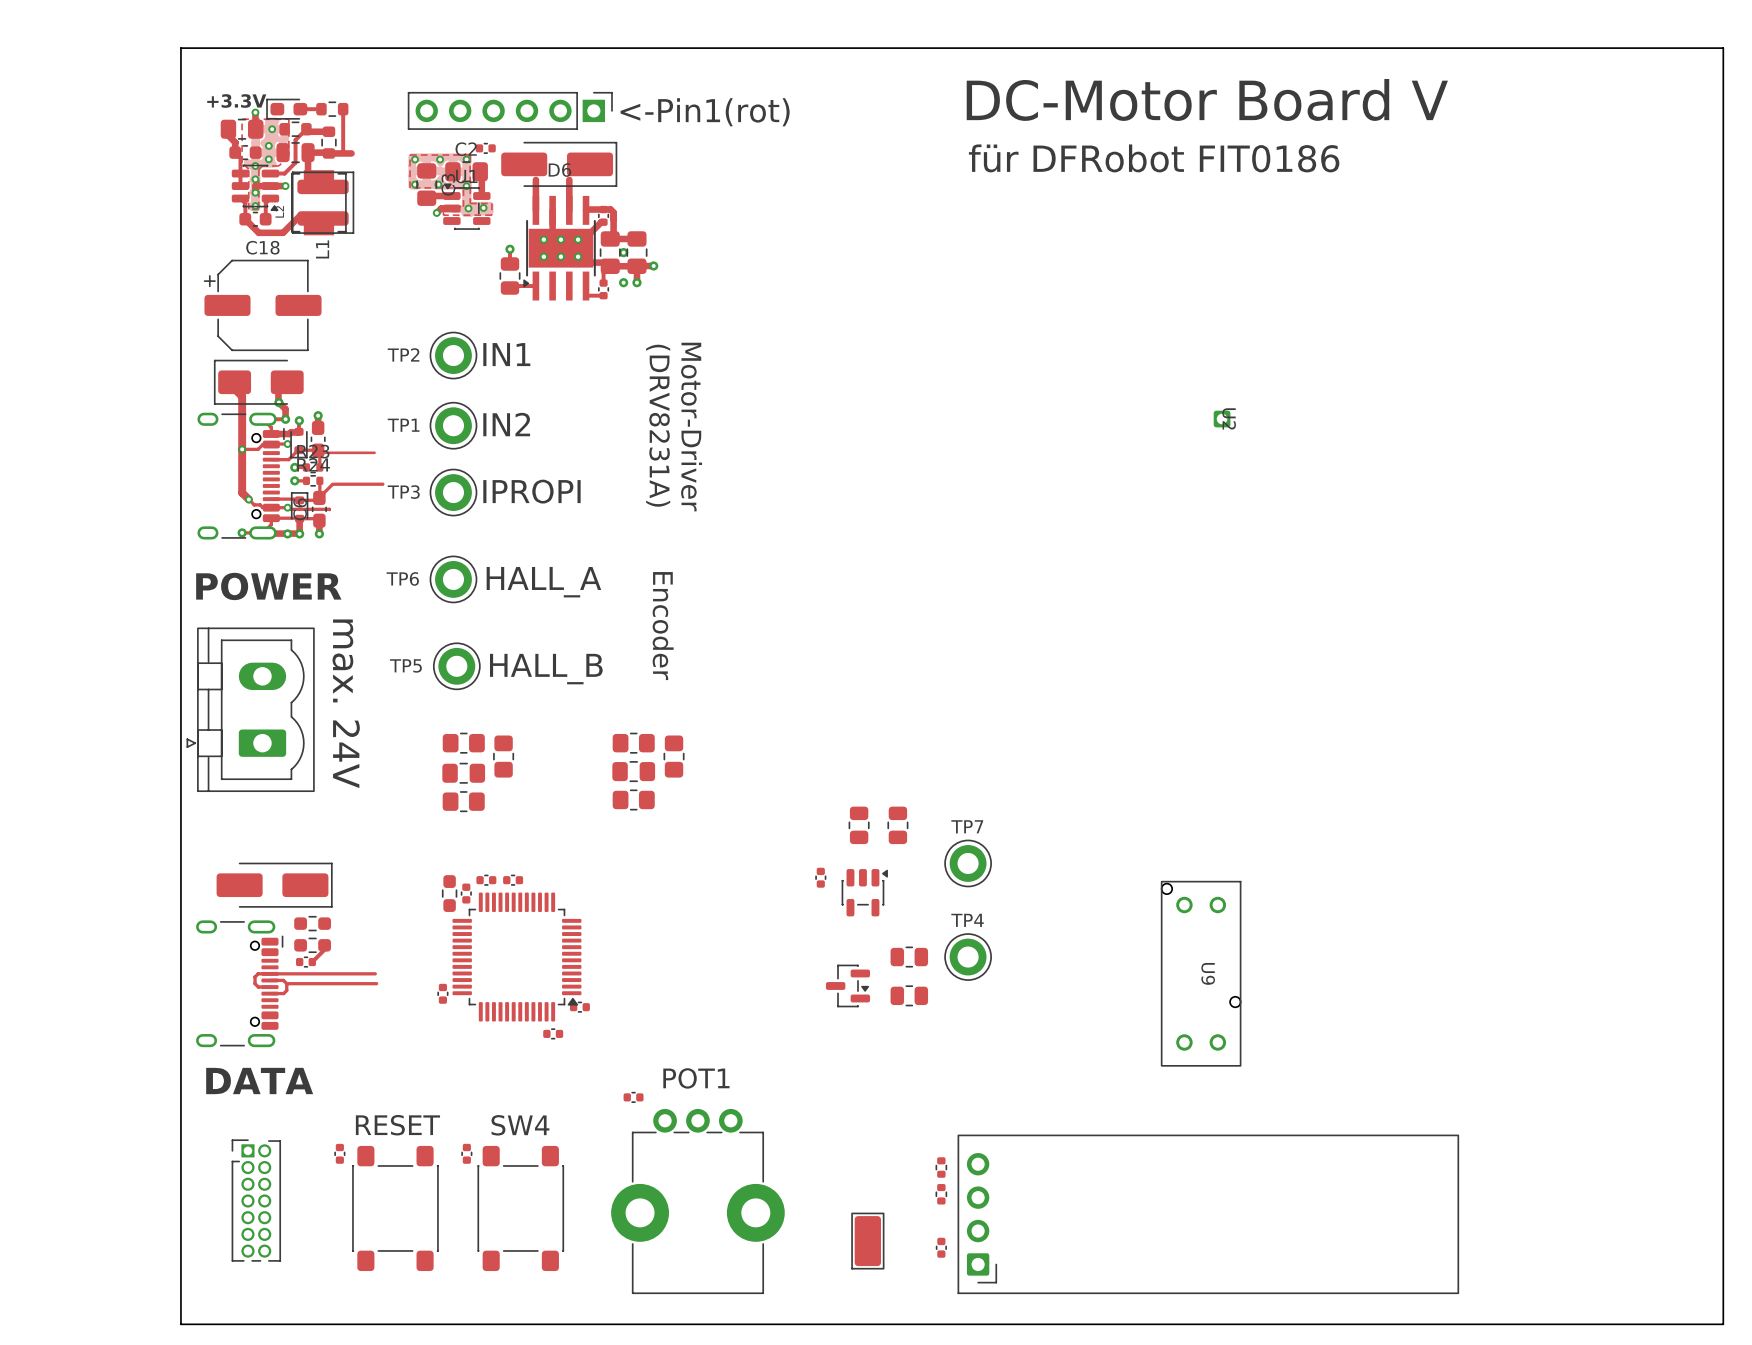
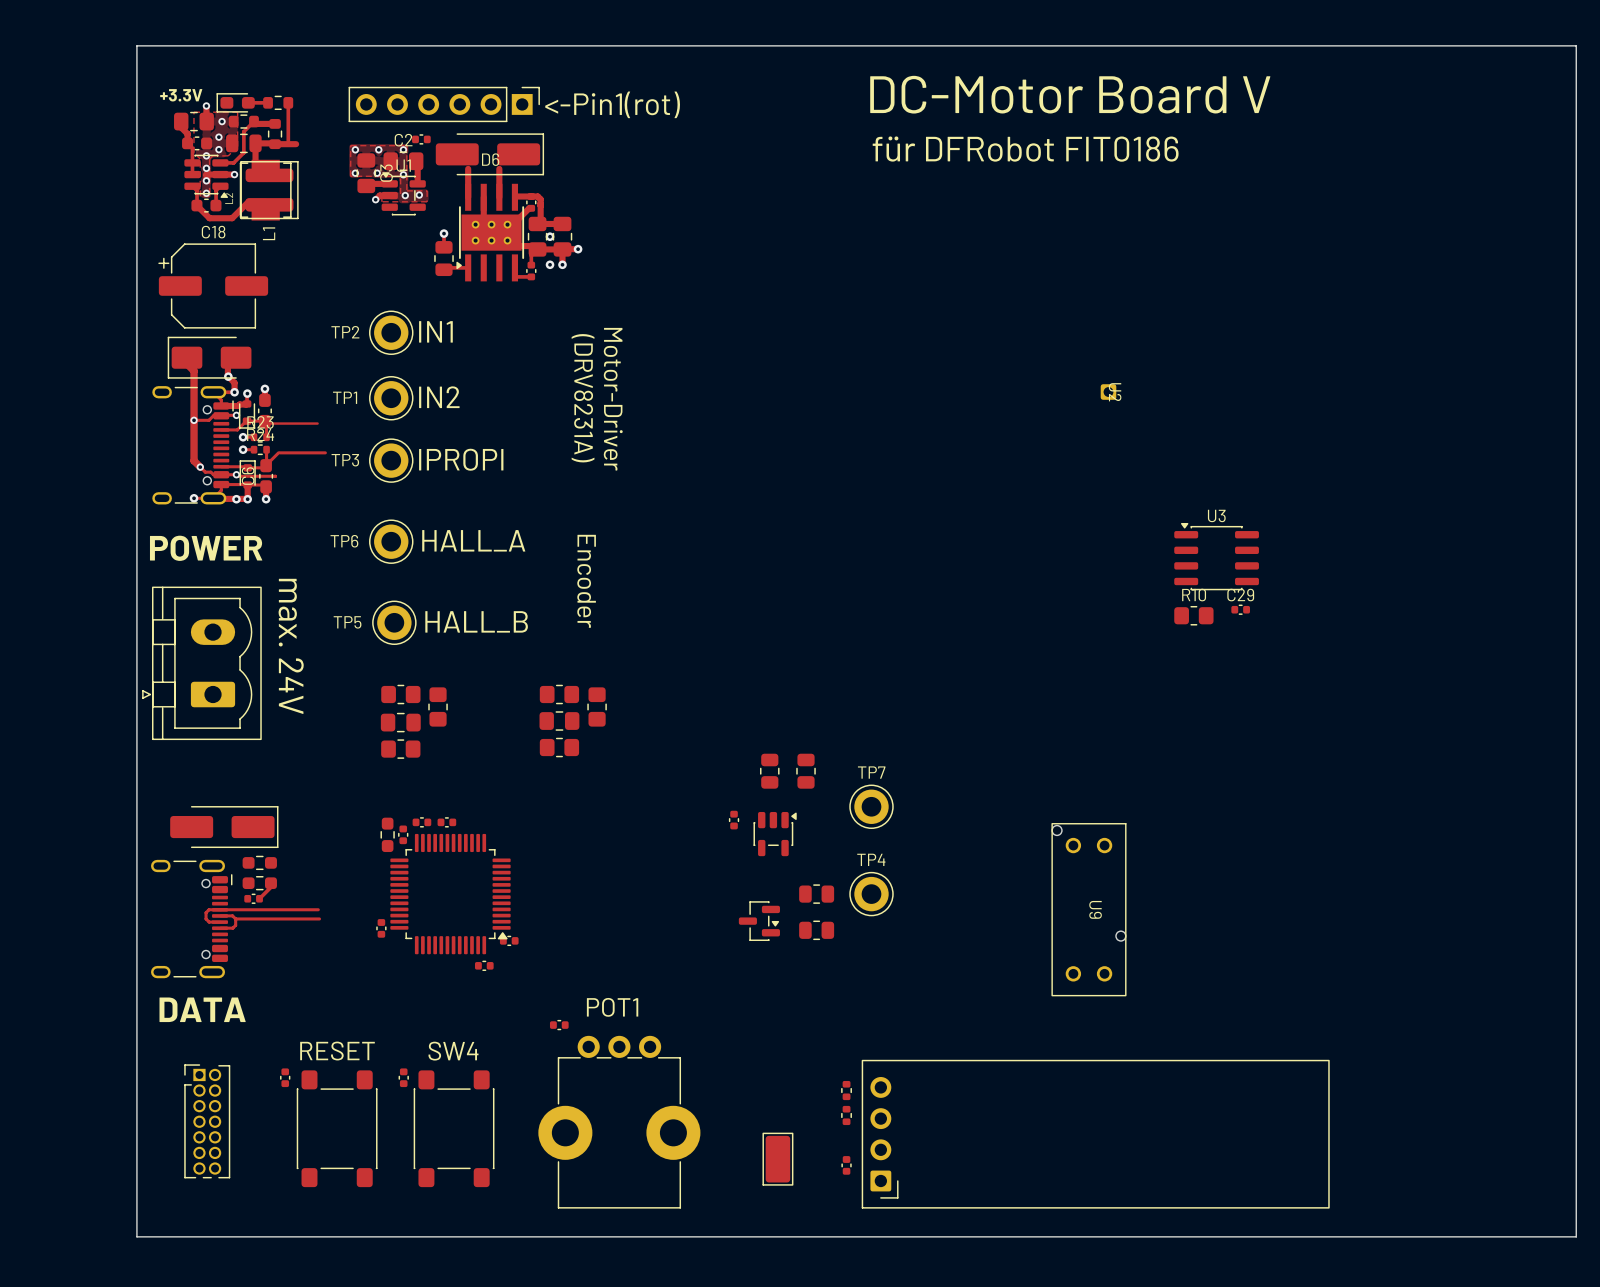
U3: none -> (1216, 556)
C29: none -> (1240, 609)
R10: none -> (1193, 615)

